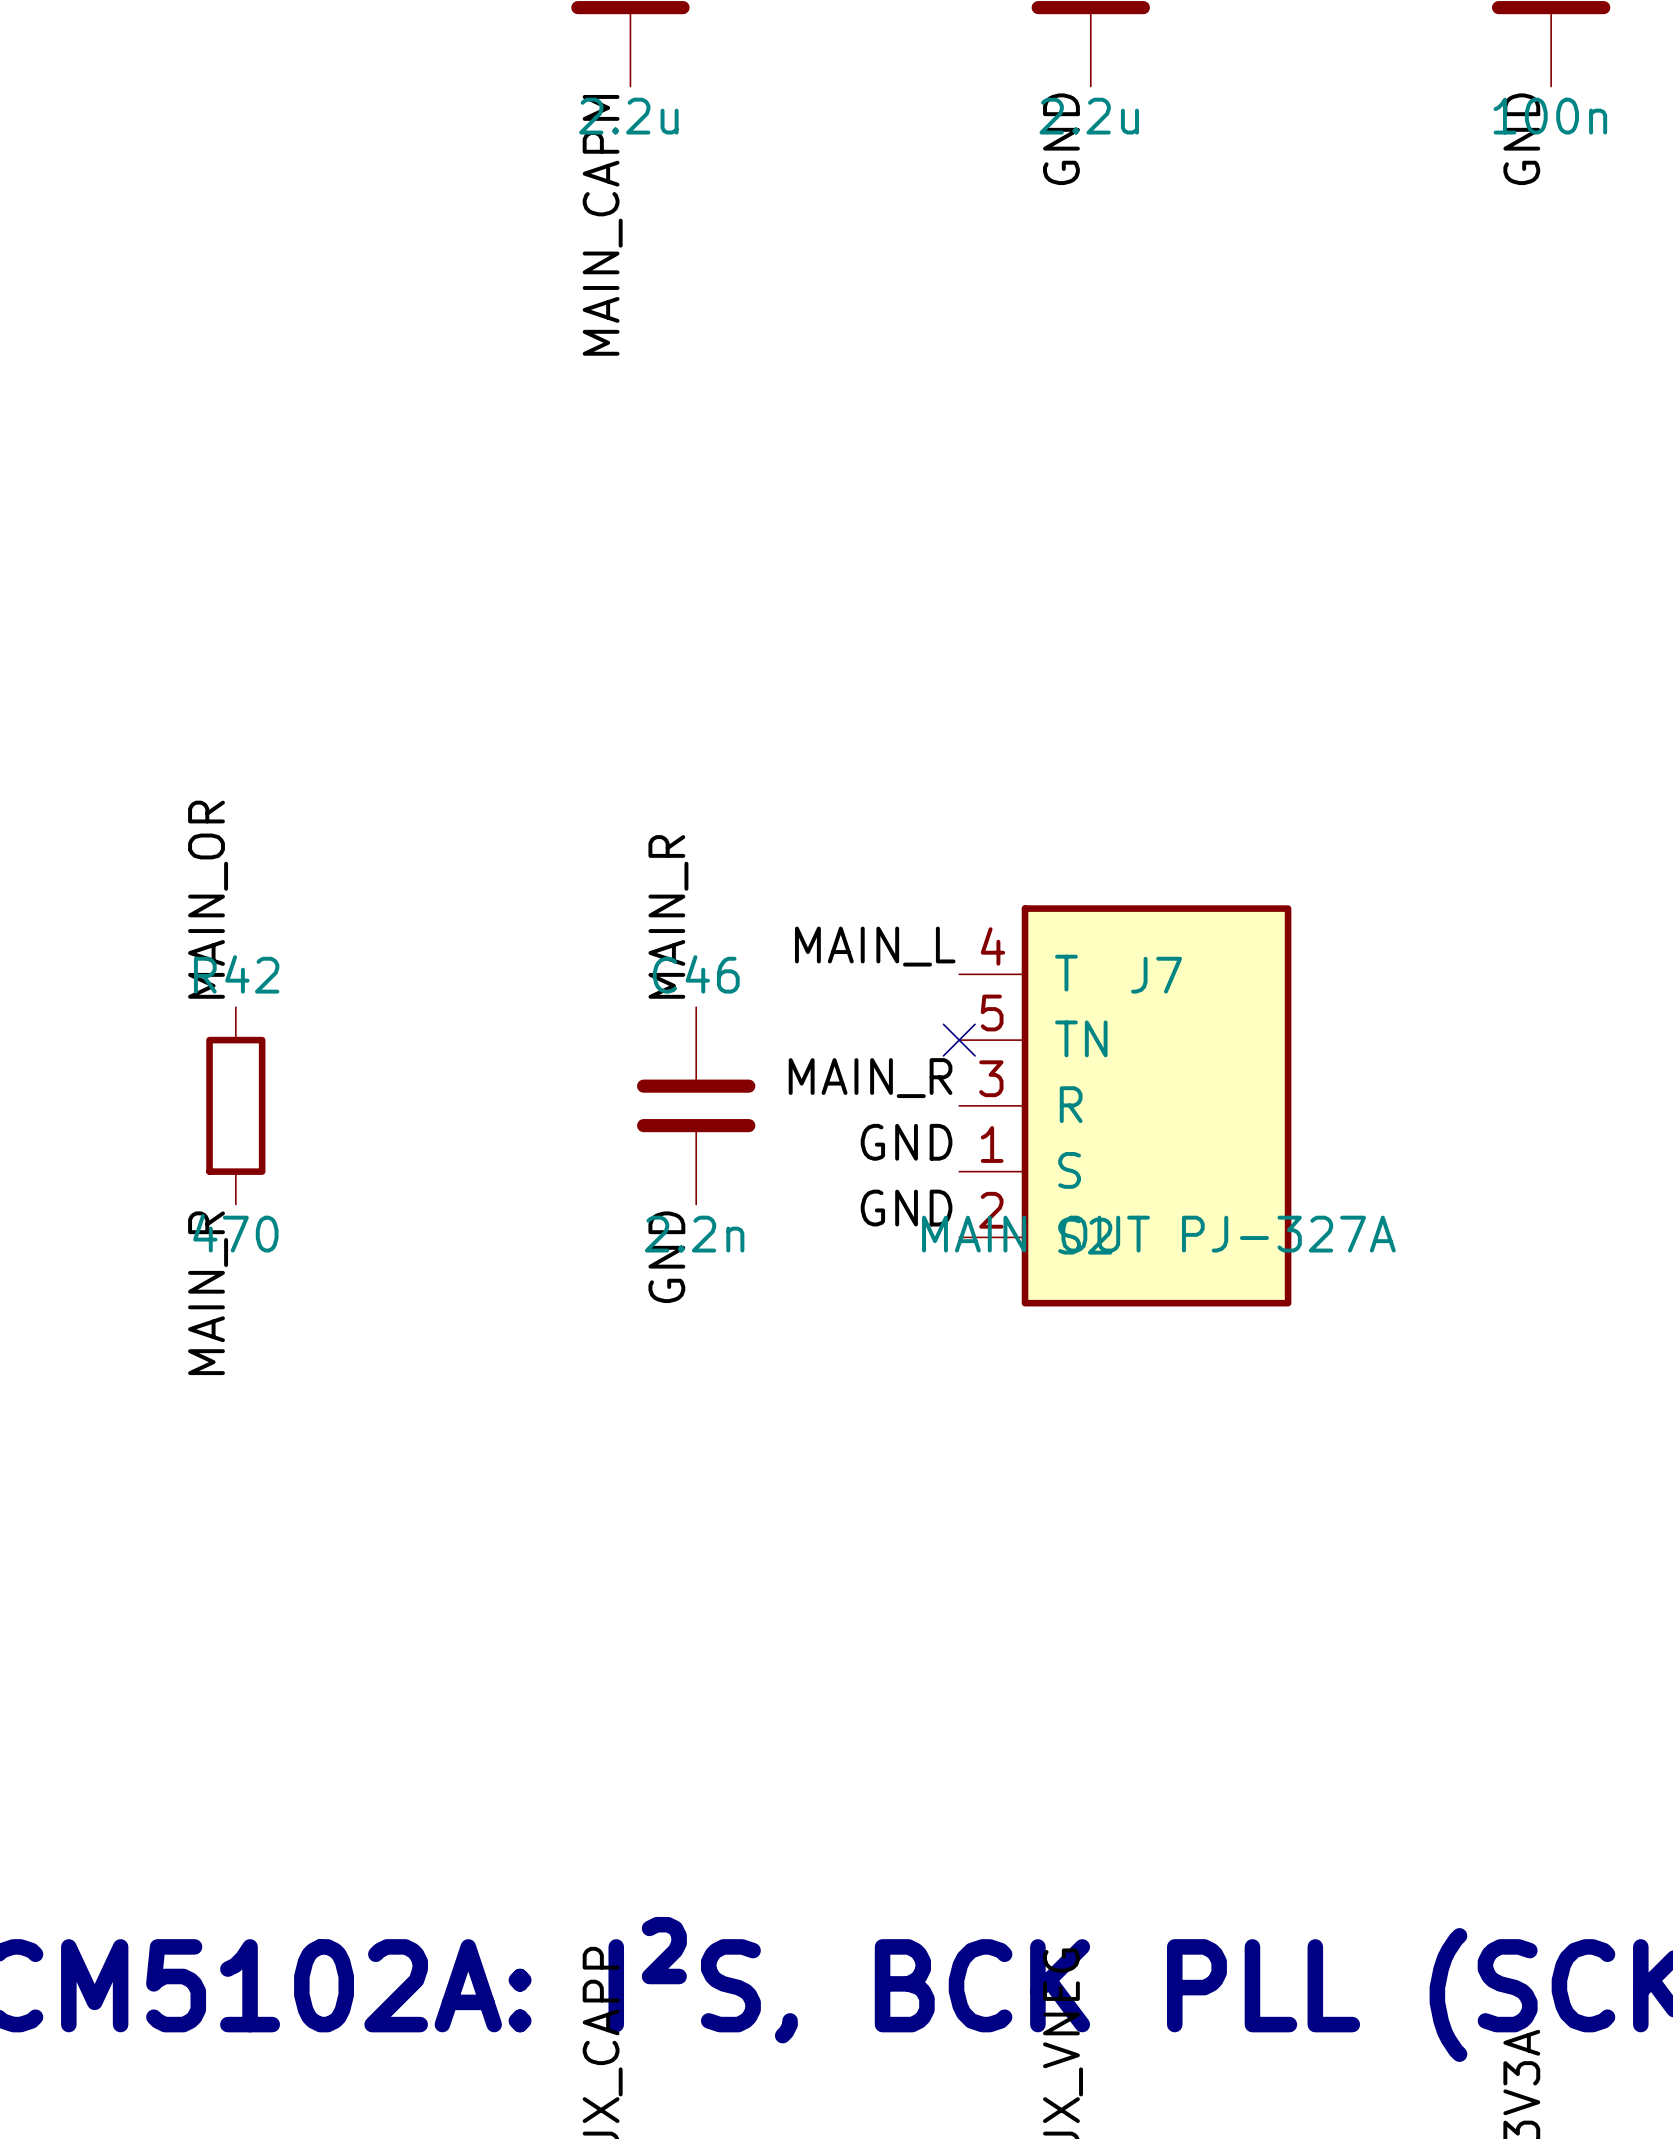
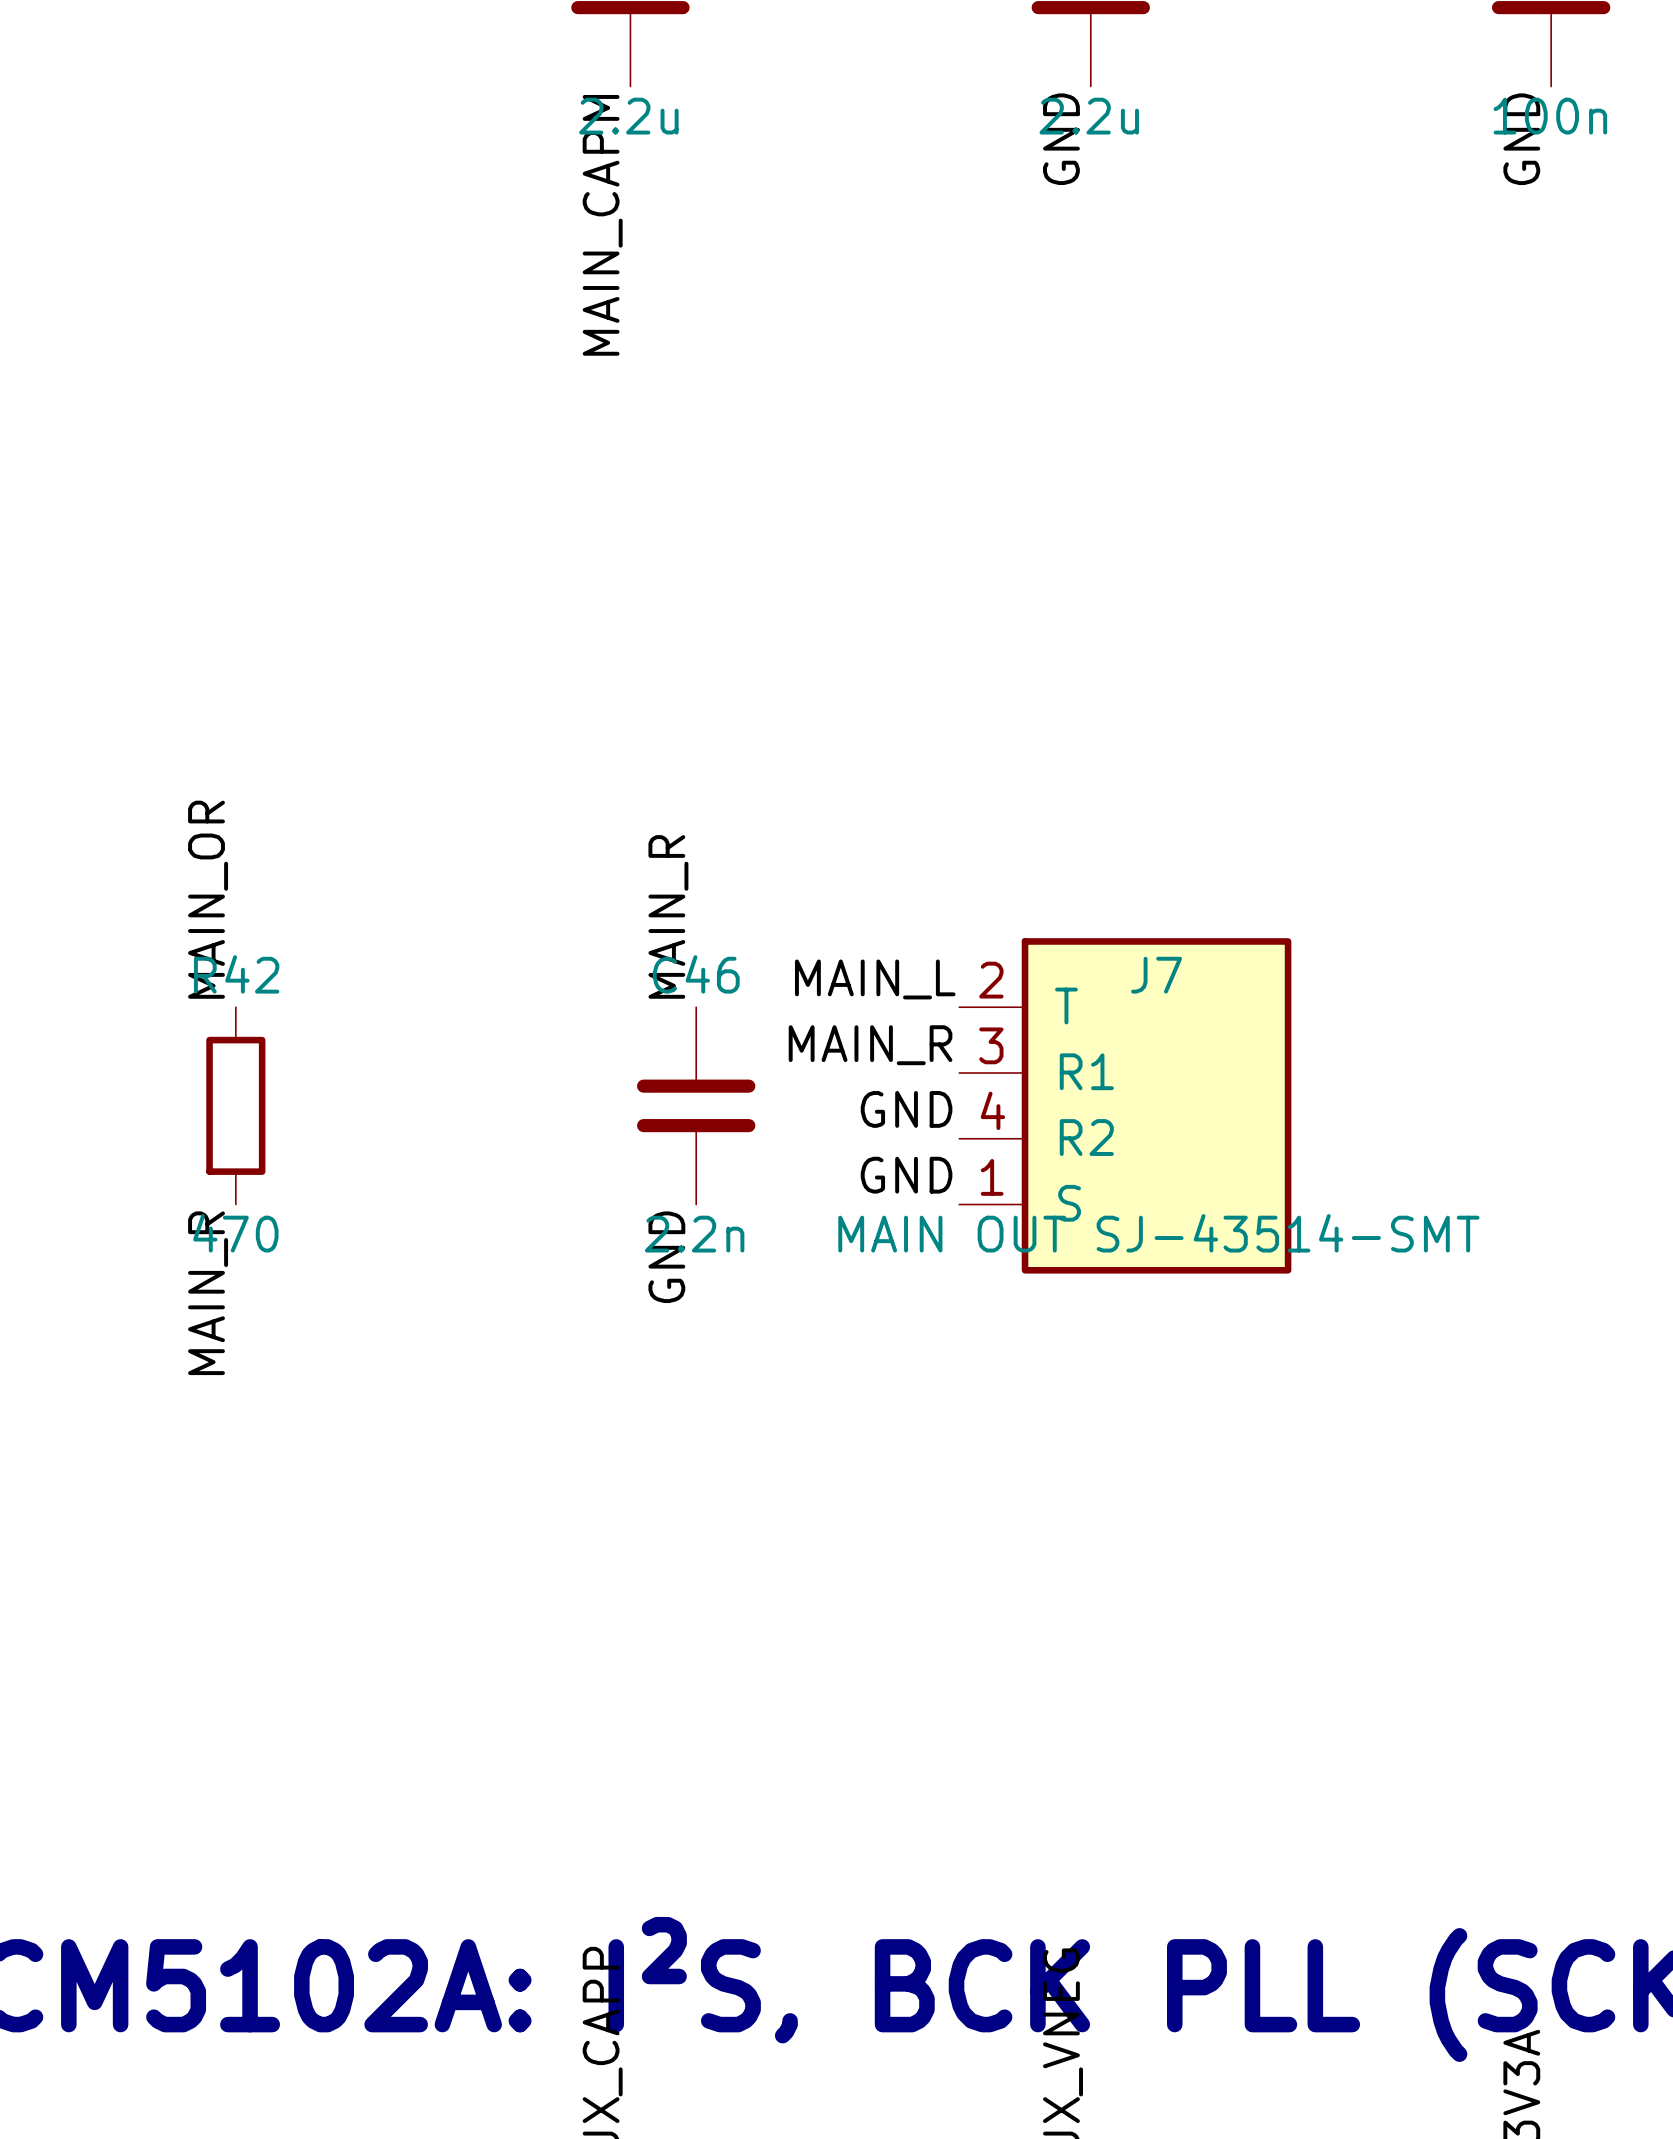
J7 symbol: [959, 905, 1292, 1307] -> [959, 938, 1292, 1274]
label position: MAIN_L (875, 946) -> MAIN_L (875, 979)
no-connect mark: (959, 1040) -> none
label position: MAIN_R (870, 1078) -> MAIN_R (870, 1045)
label: none -> GND (906, 1109)
label: GND (906, 1142) -> none
label: none -> GND (906, 1175)
label: GND (906, 1208) -> none
J7 value: MAIN OUT PJ-327A (1158, 1234) -> MAIN OUT SJ-43514-SMT (1158, 1233)

